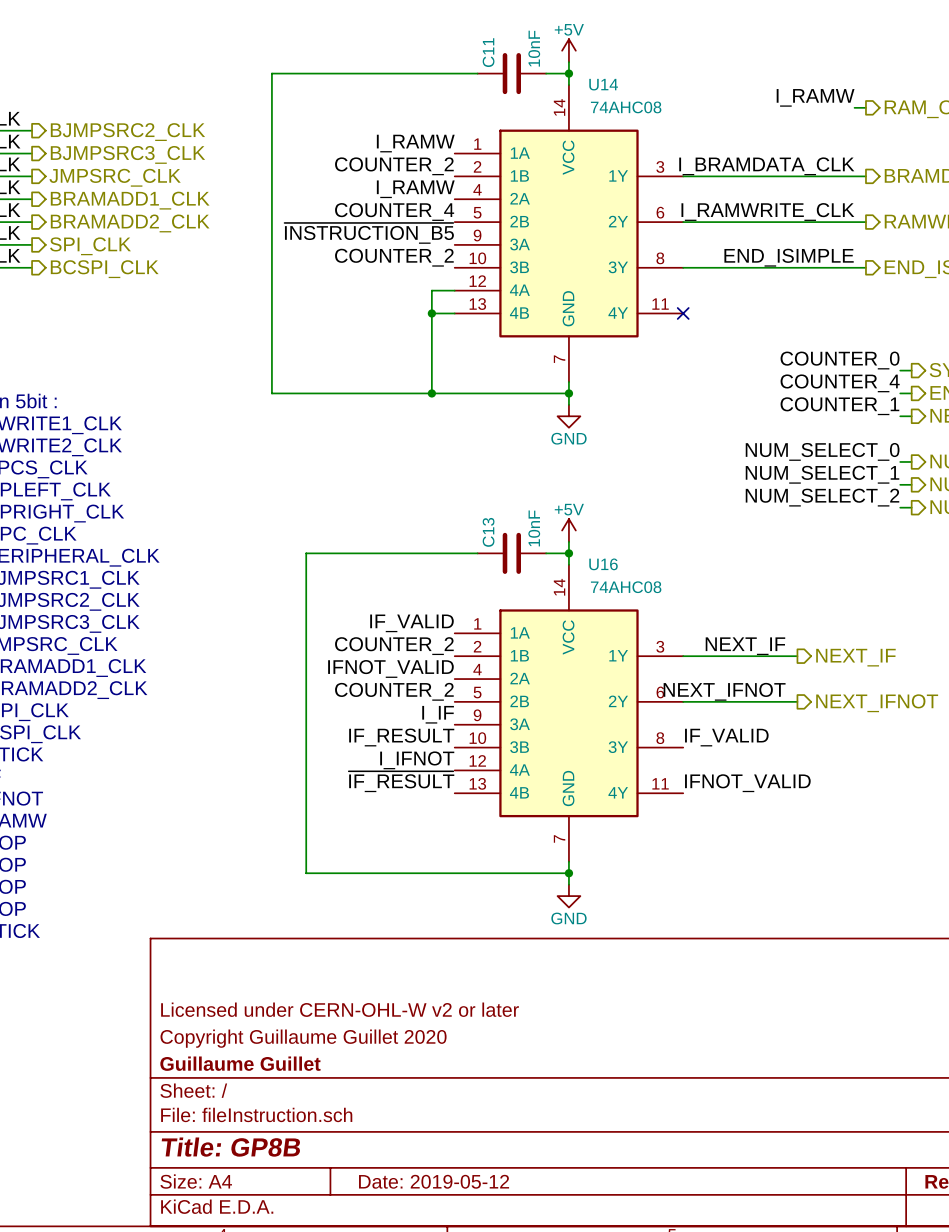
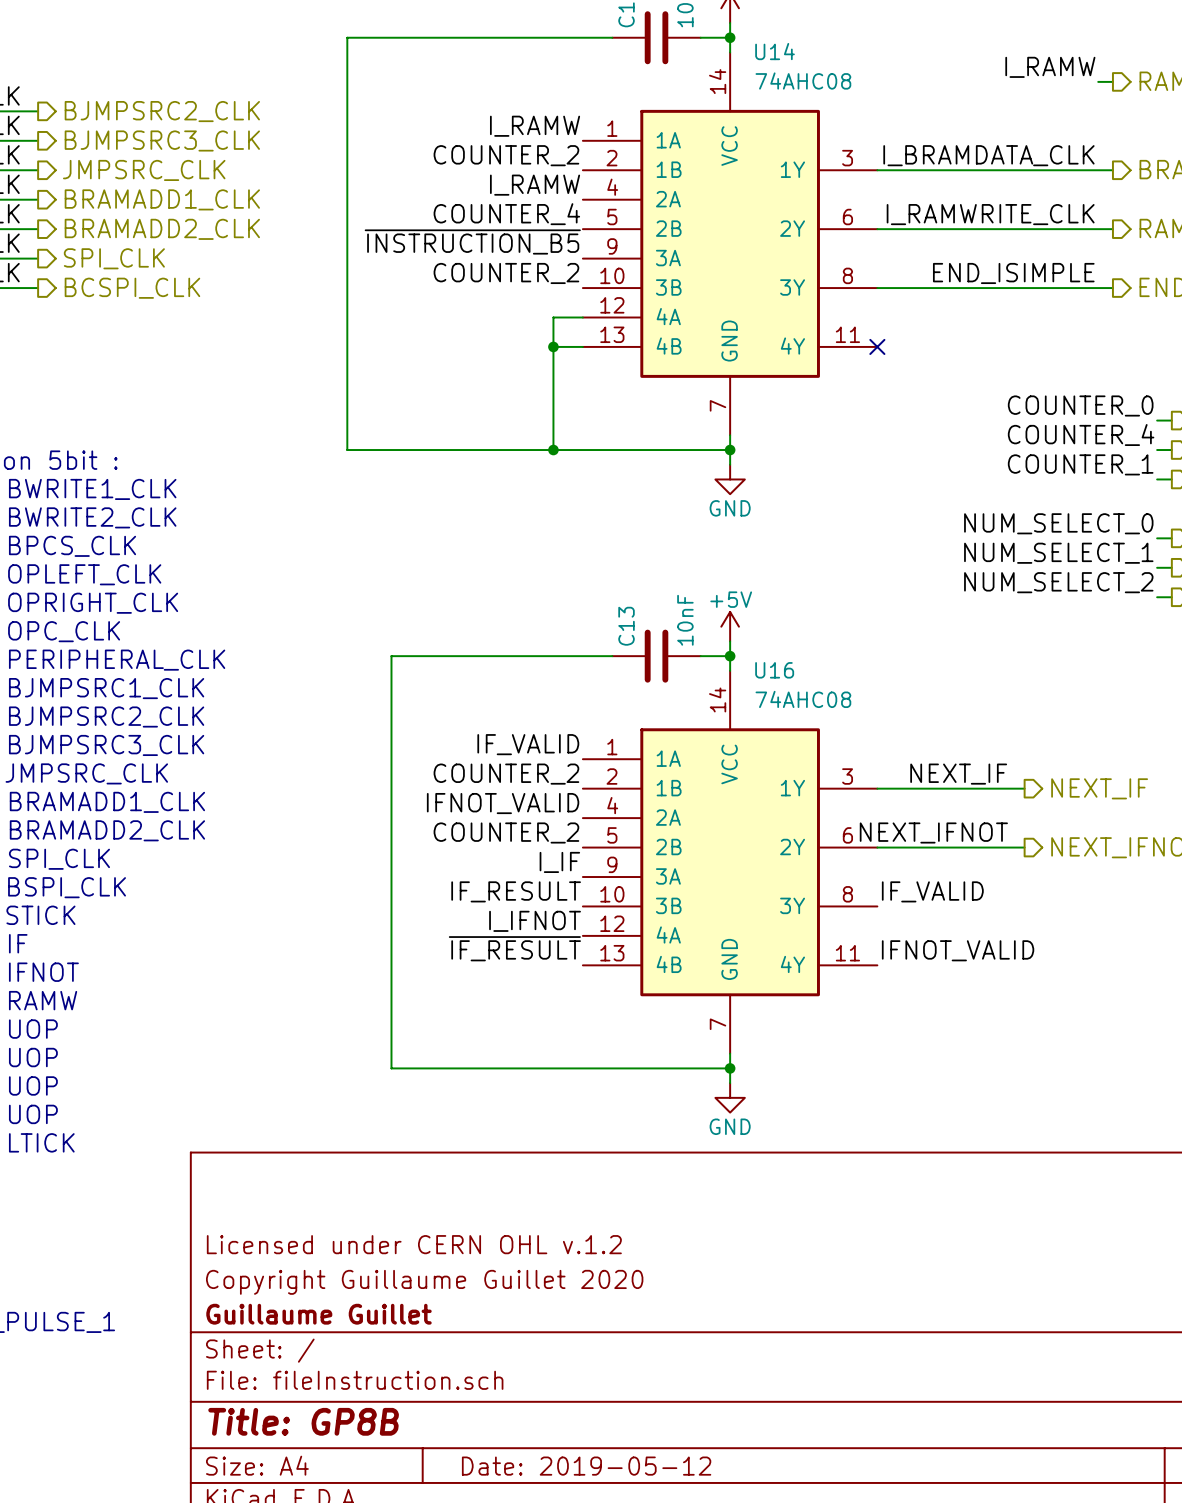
title block: Licensed under CERN-OHL-W v2 or later (340, 1009) -> Licensed under CERN OHL v.1.2 (414, 1244)

